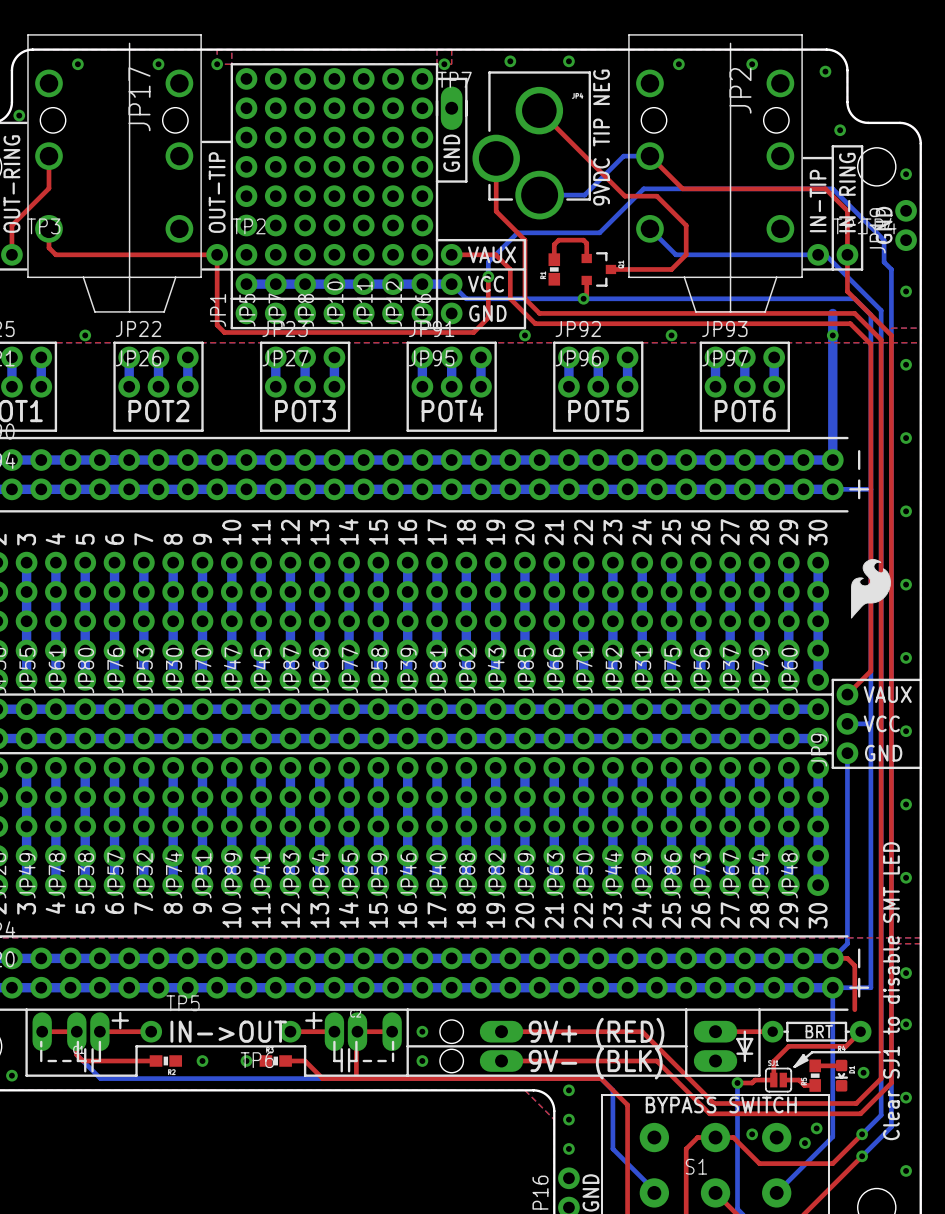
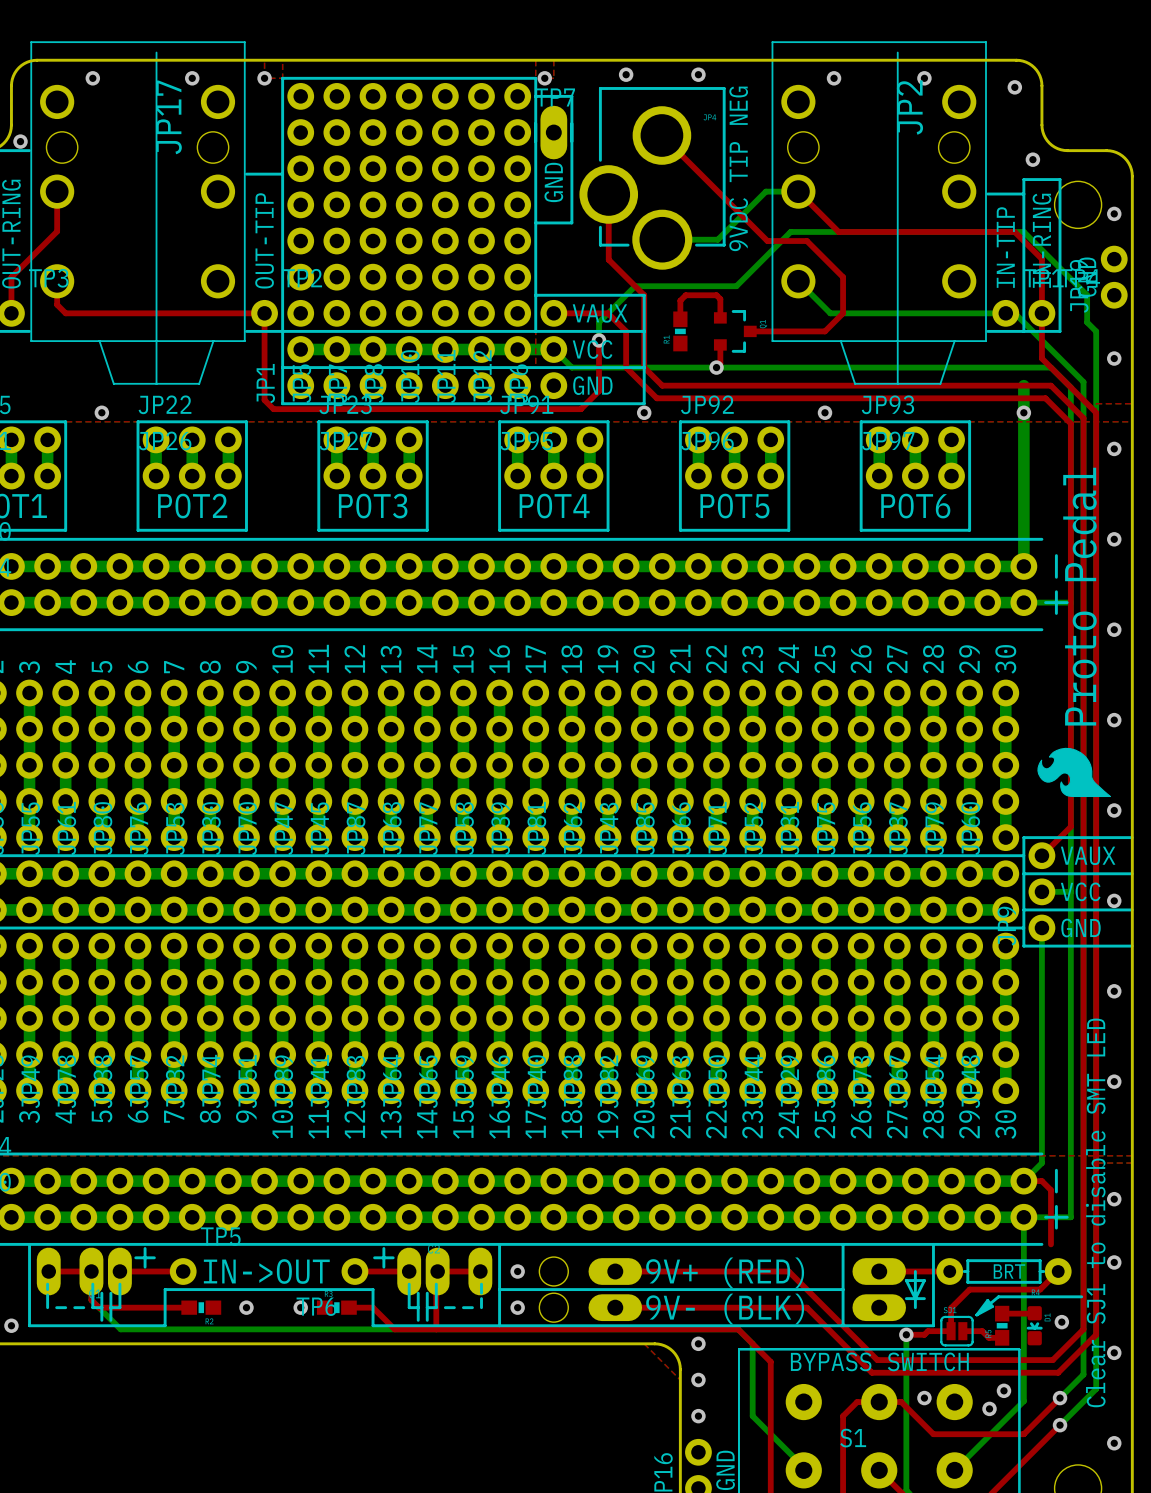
line: (437, 269) (437, 328) -> none
text: none -> Proto Pedal (1079, 596)
drawing: [851, 558, 891, 619] -> none
drawing: none -> [1037, 747, 1111, 798]
line: none -> (1023, 873) (1132, 873)
line: none -> (1023, 909) (1132, 909)

